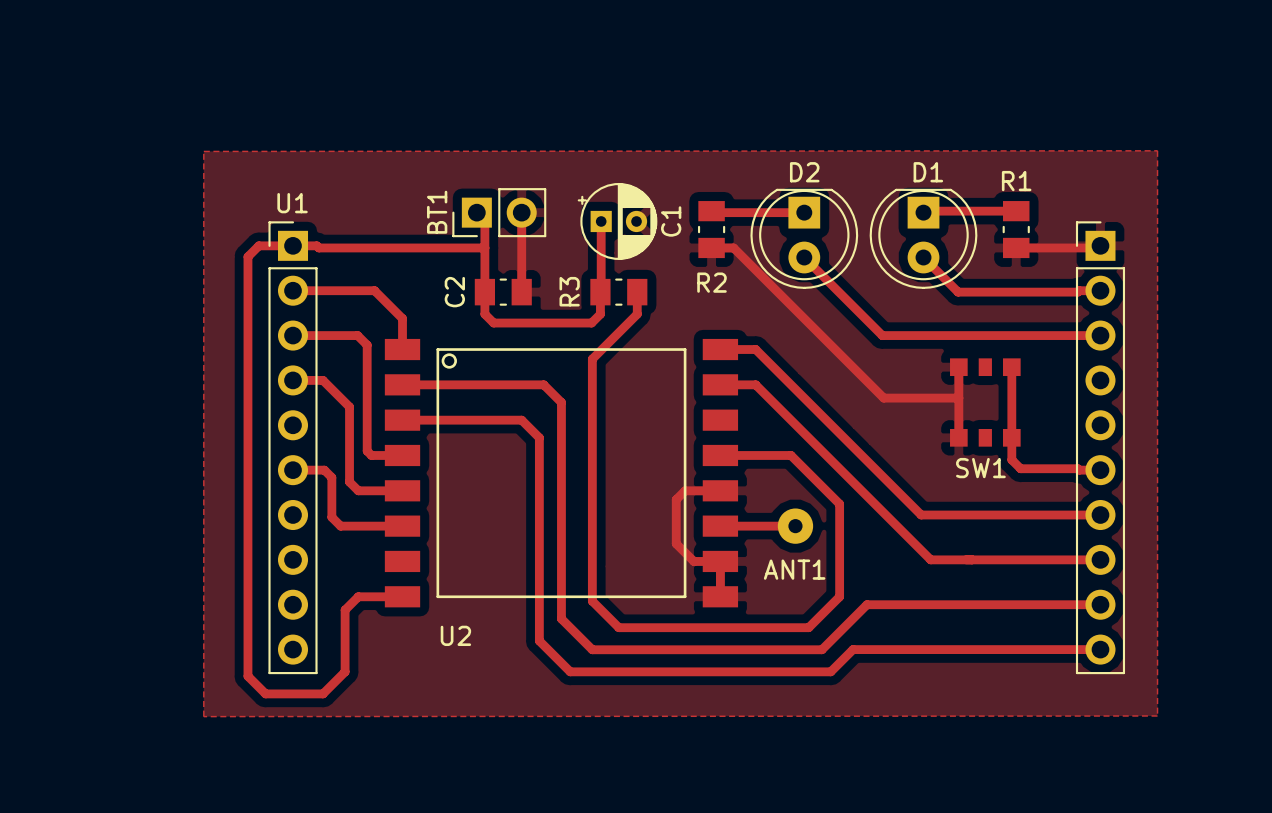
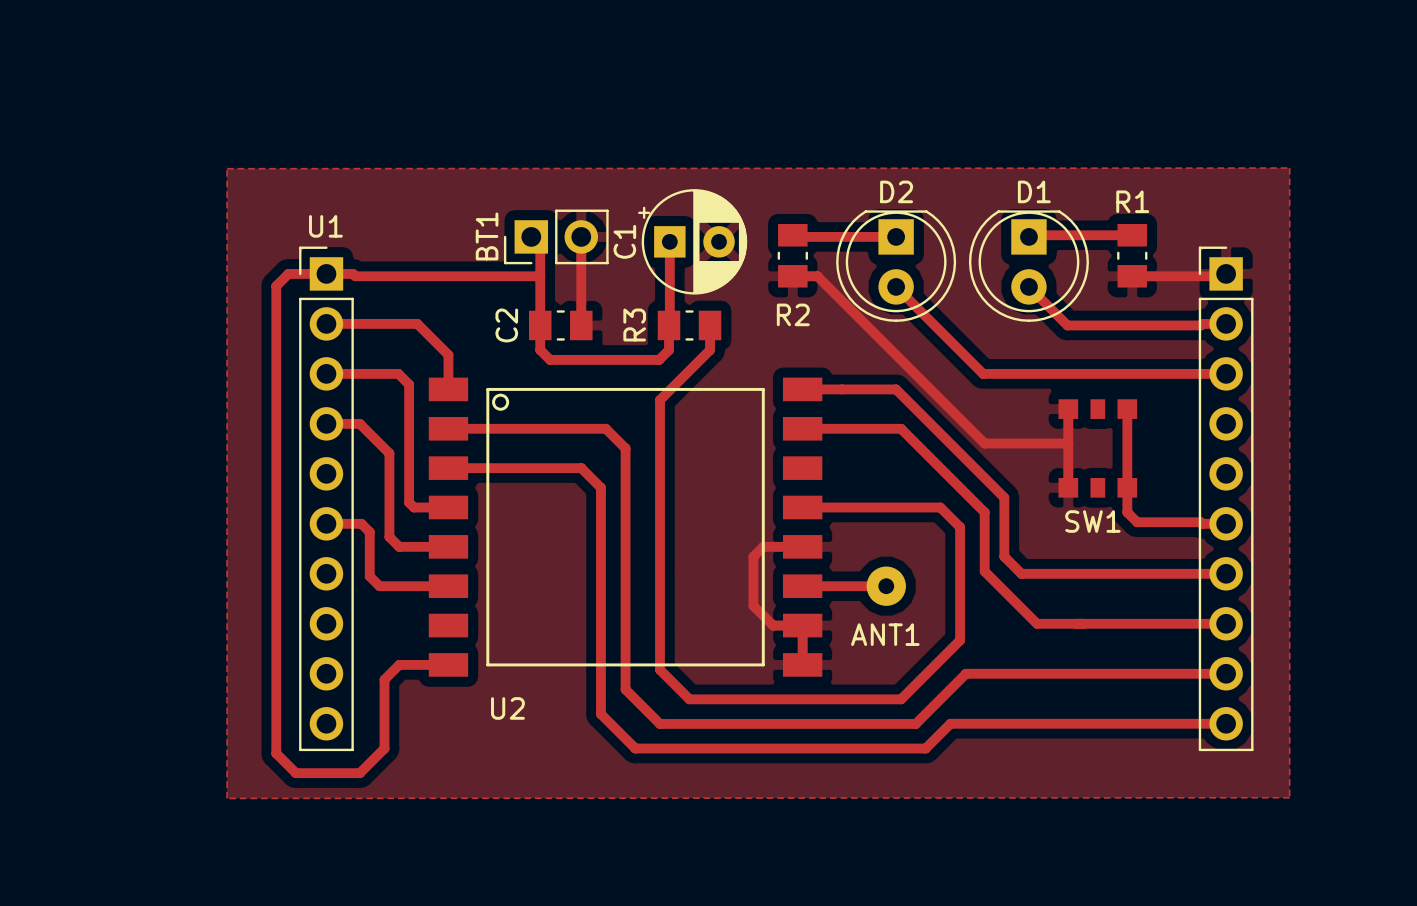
C1 footprint: [577, 182, 658, 260] -> [638, 189, 748, 295]
C1 name position: C1 (671, 221) -> C1 (624, 241)
track: (755, 349) (921, 515) -> (842, 389) (896, 389) (1004, 497) (1004, 556) (1021, 573) (1026, 573)
track: (755, 384) (883, 512) -> (842, 428) (901, 428) (984, 512) (984, 571)
track: (791, 455) (839, 504) (839, 596) -> (881, 507) (940, 507) (960, 527) (960, 640) (935, 664)

